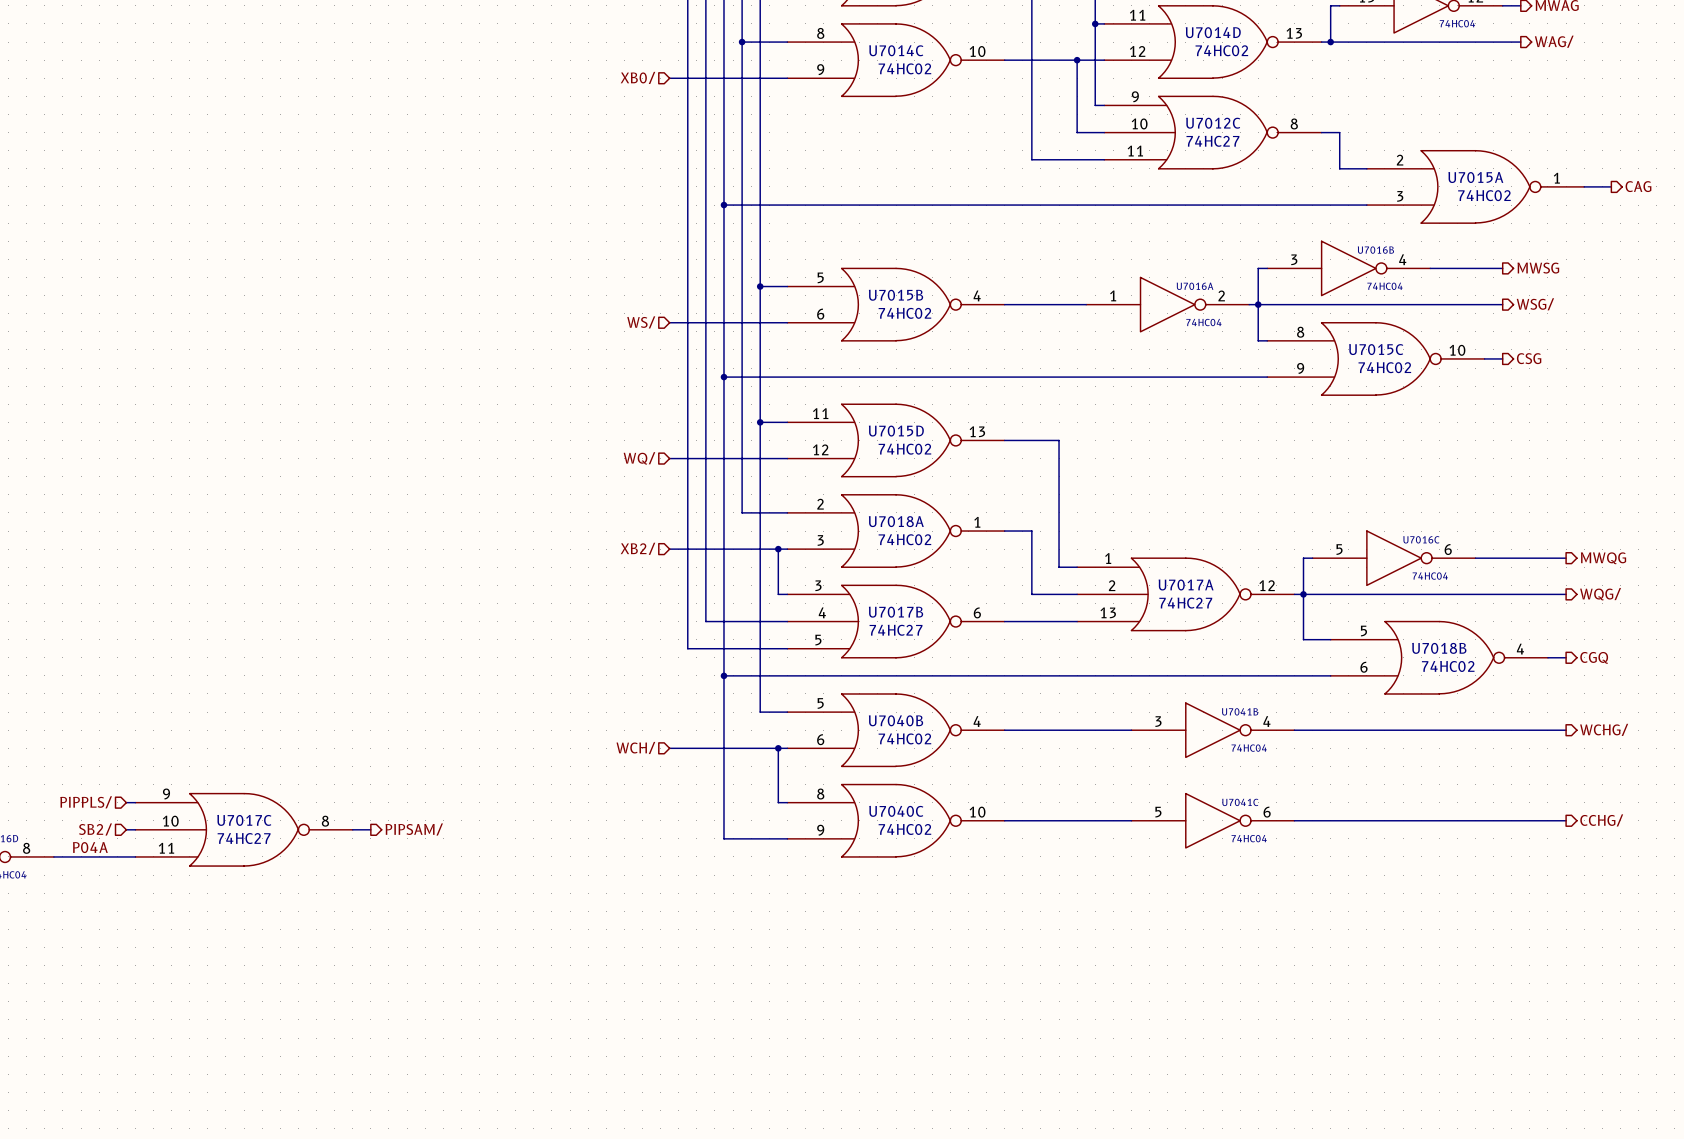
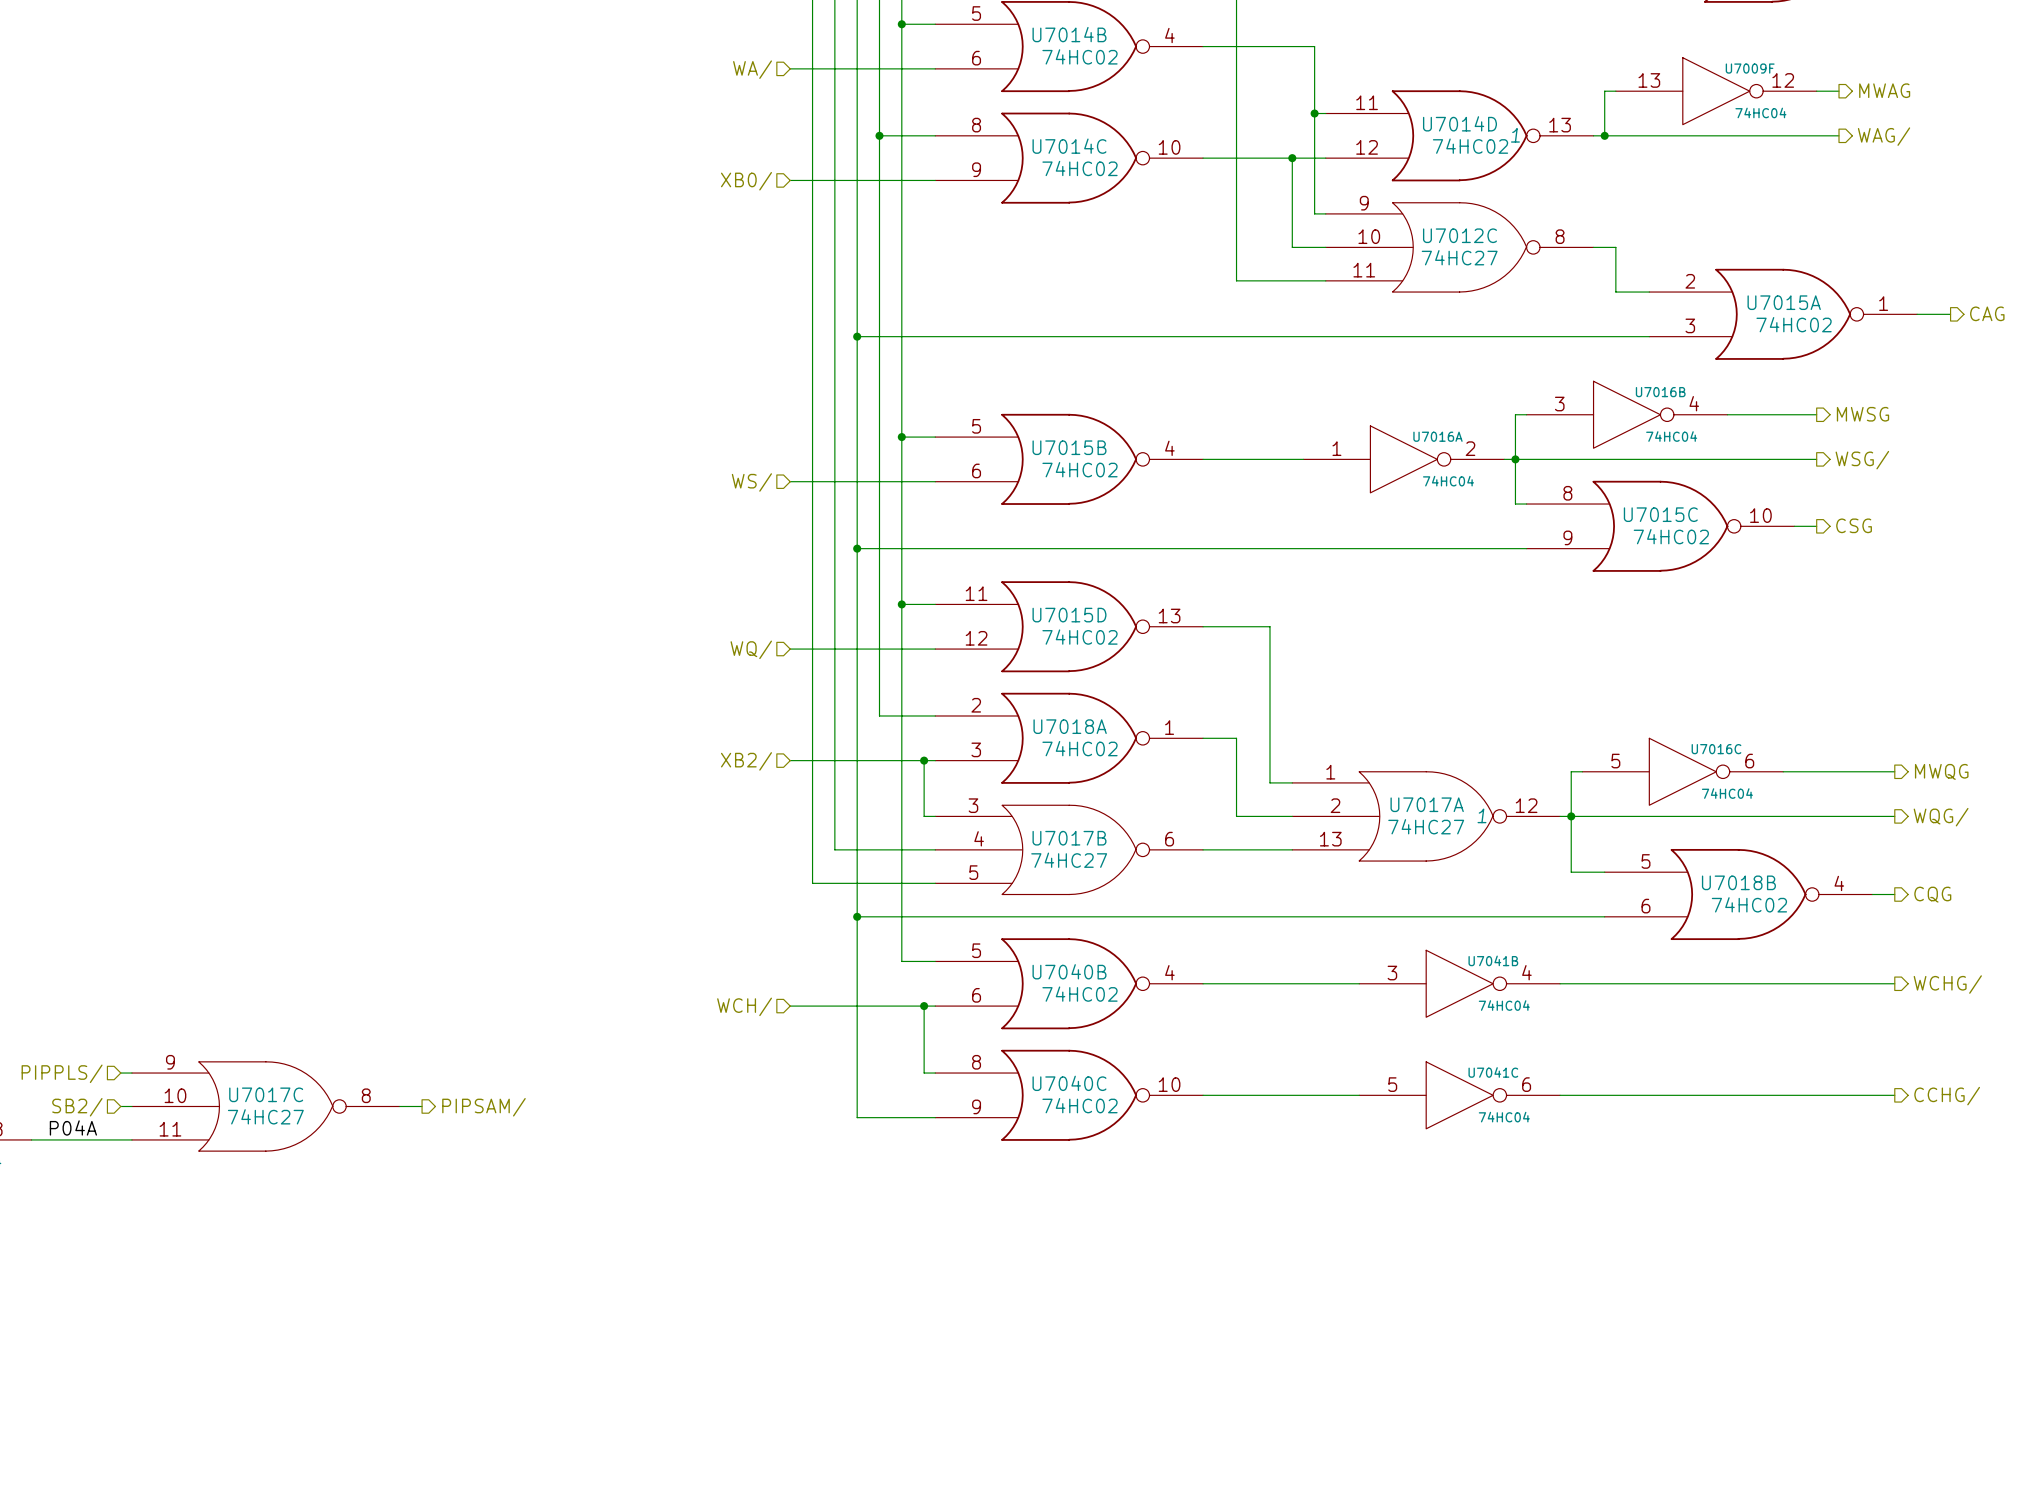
U7014D text: none -> 1 (1515, 135)
U7017A text: none -> 1 (1481, 815)
hierarchical label: CGQ (1594, 657) -> CQG (1932, 894)

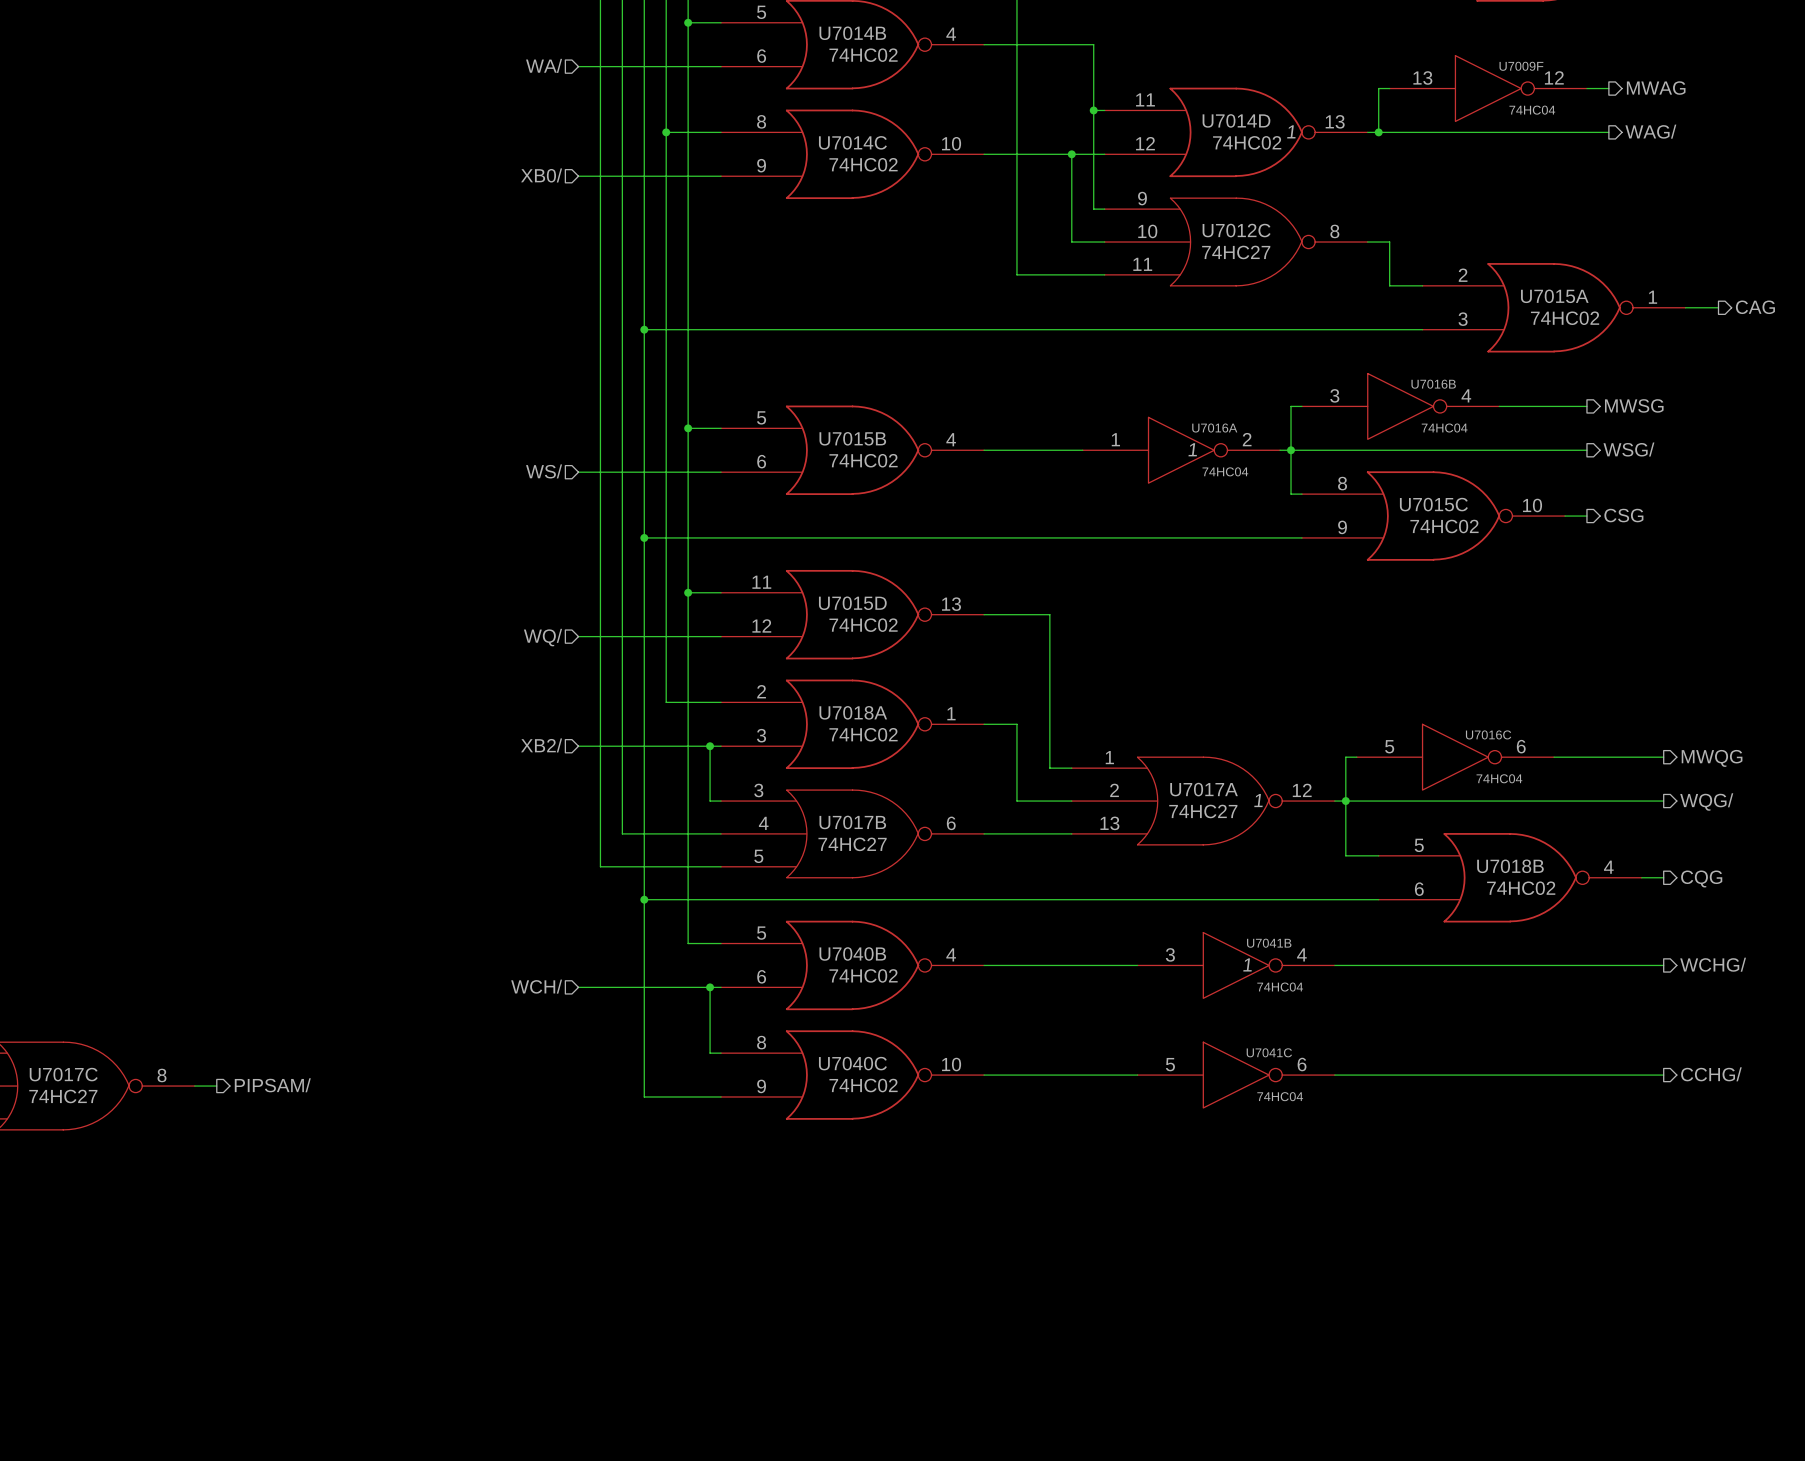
U7016A text: none -> 1 (1192, 449)
U7041B text: none -> 1 (1247, 964)

